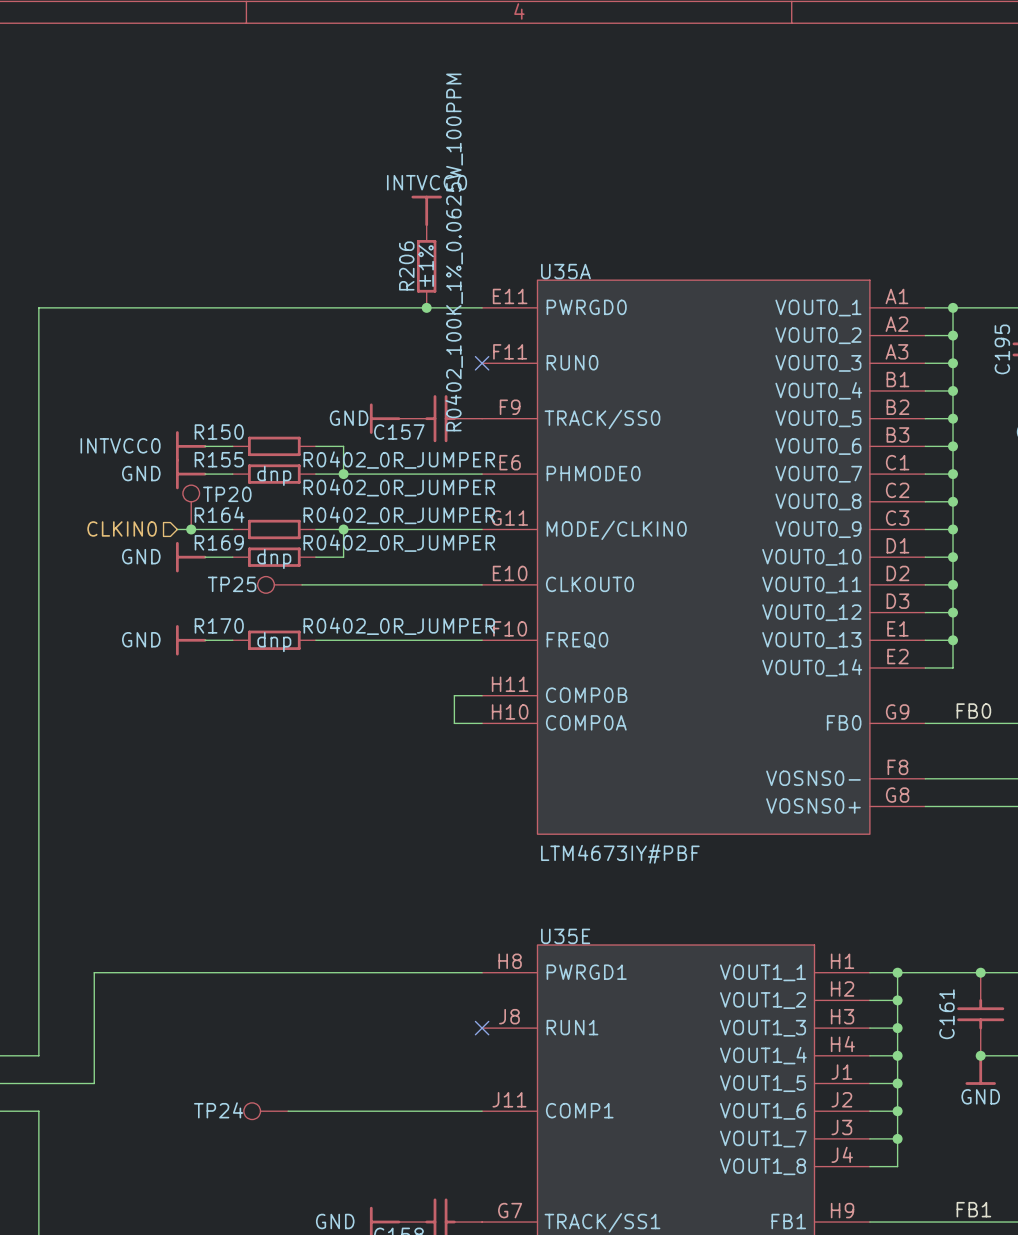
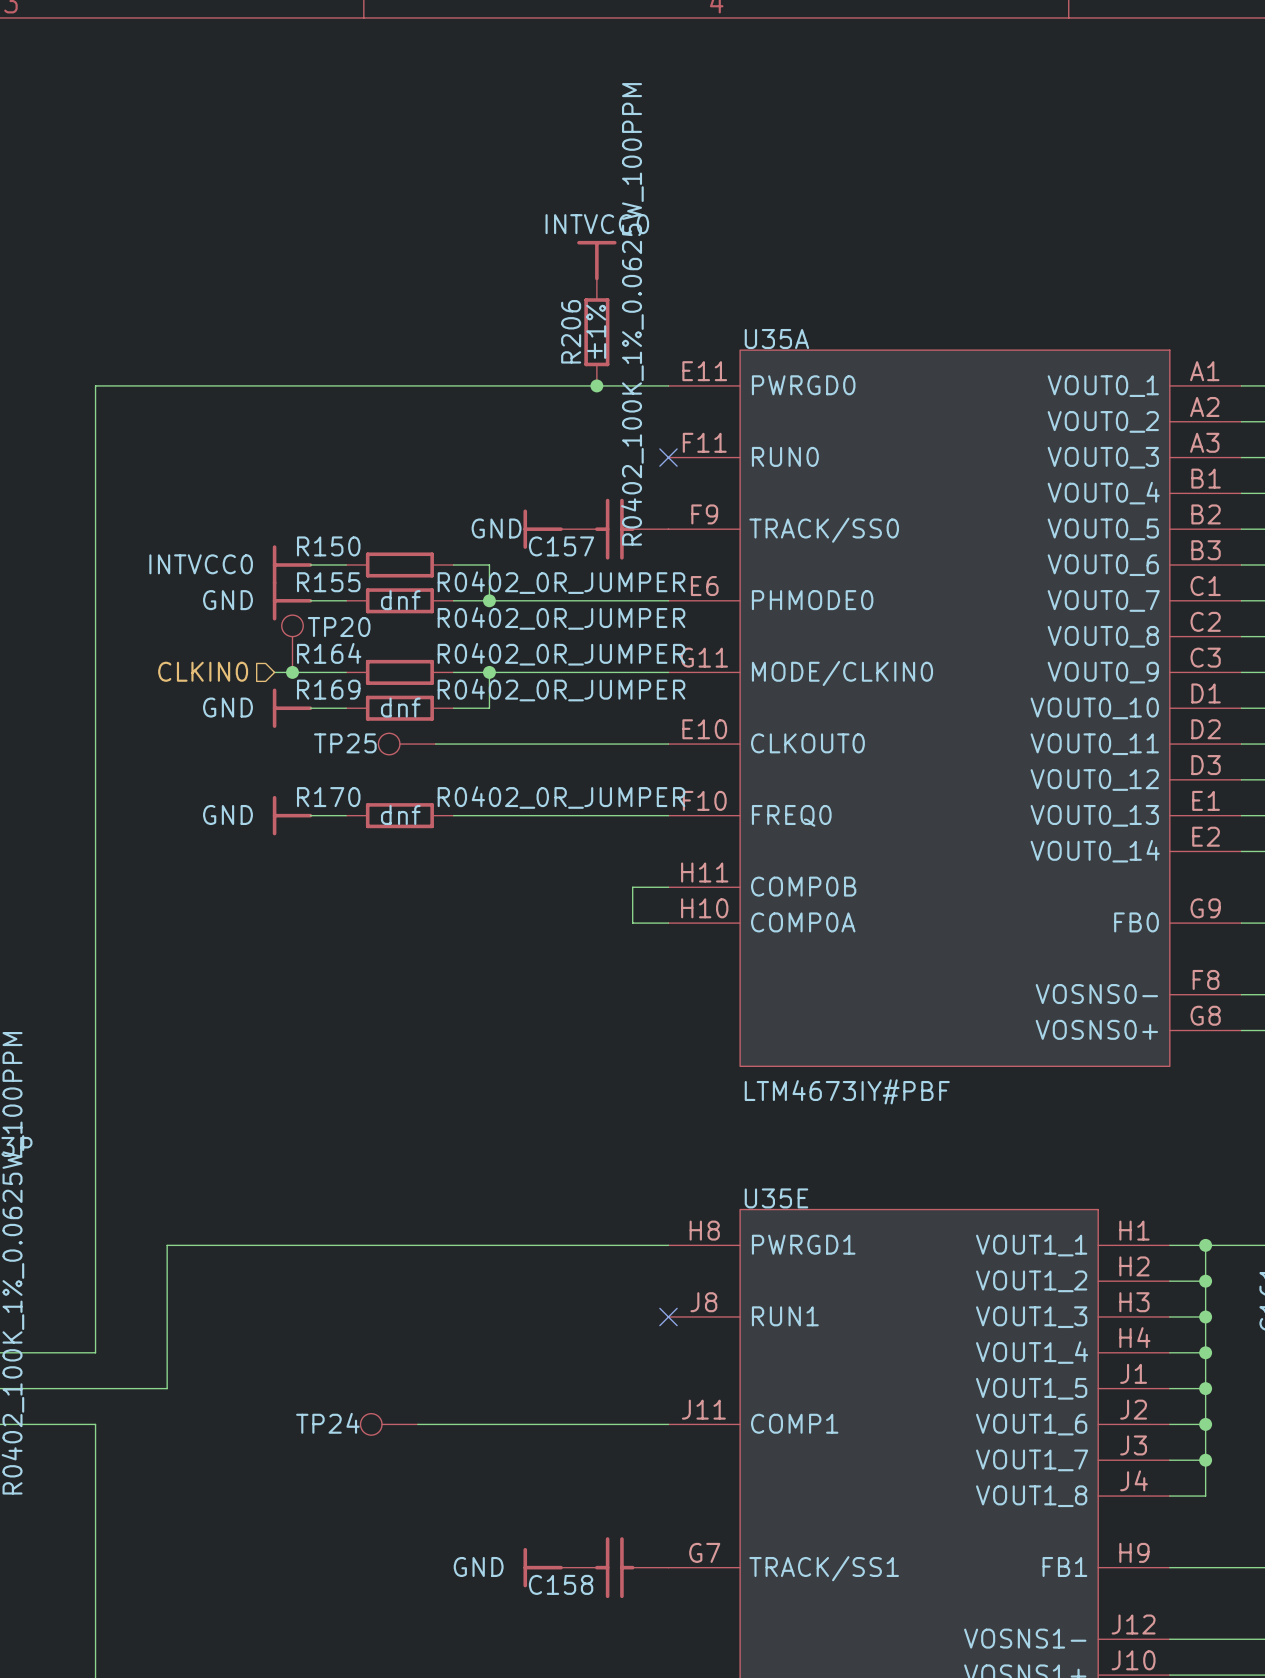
R155 text: dnp (274, 475) -> dnf (400, 600)
R169 text: dnp (274, 558) -> dnf (400, 707)
R170 text: dnp (274, 642) -> dnf (400, 814)

